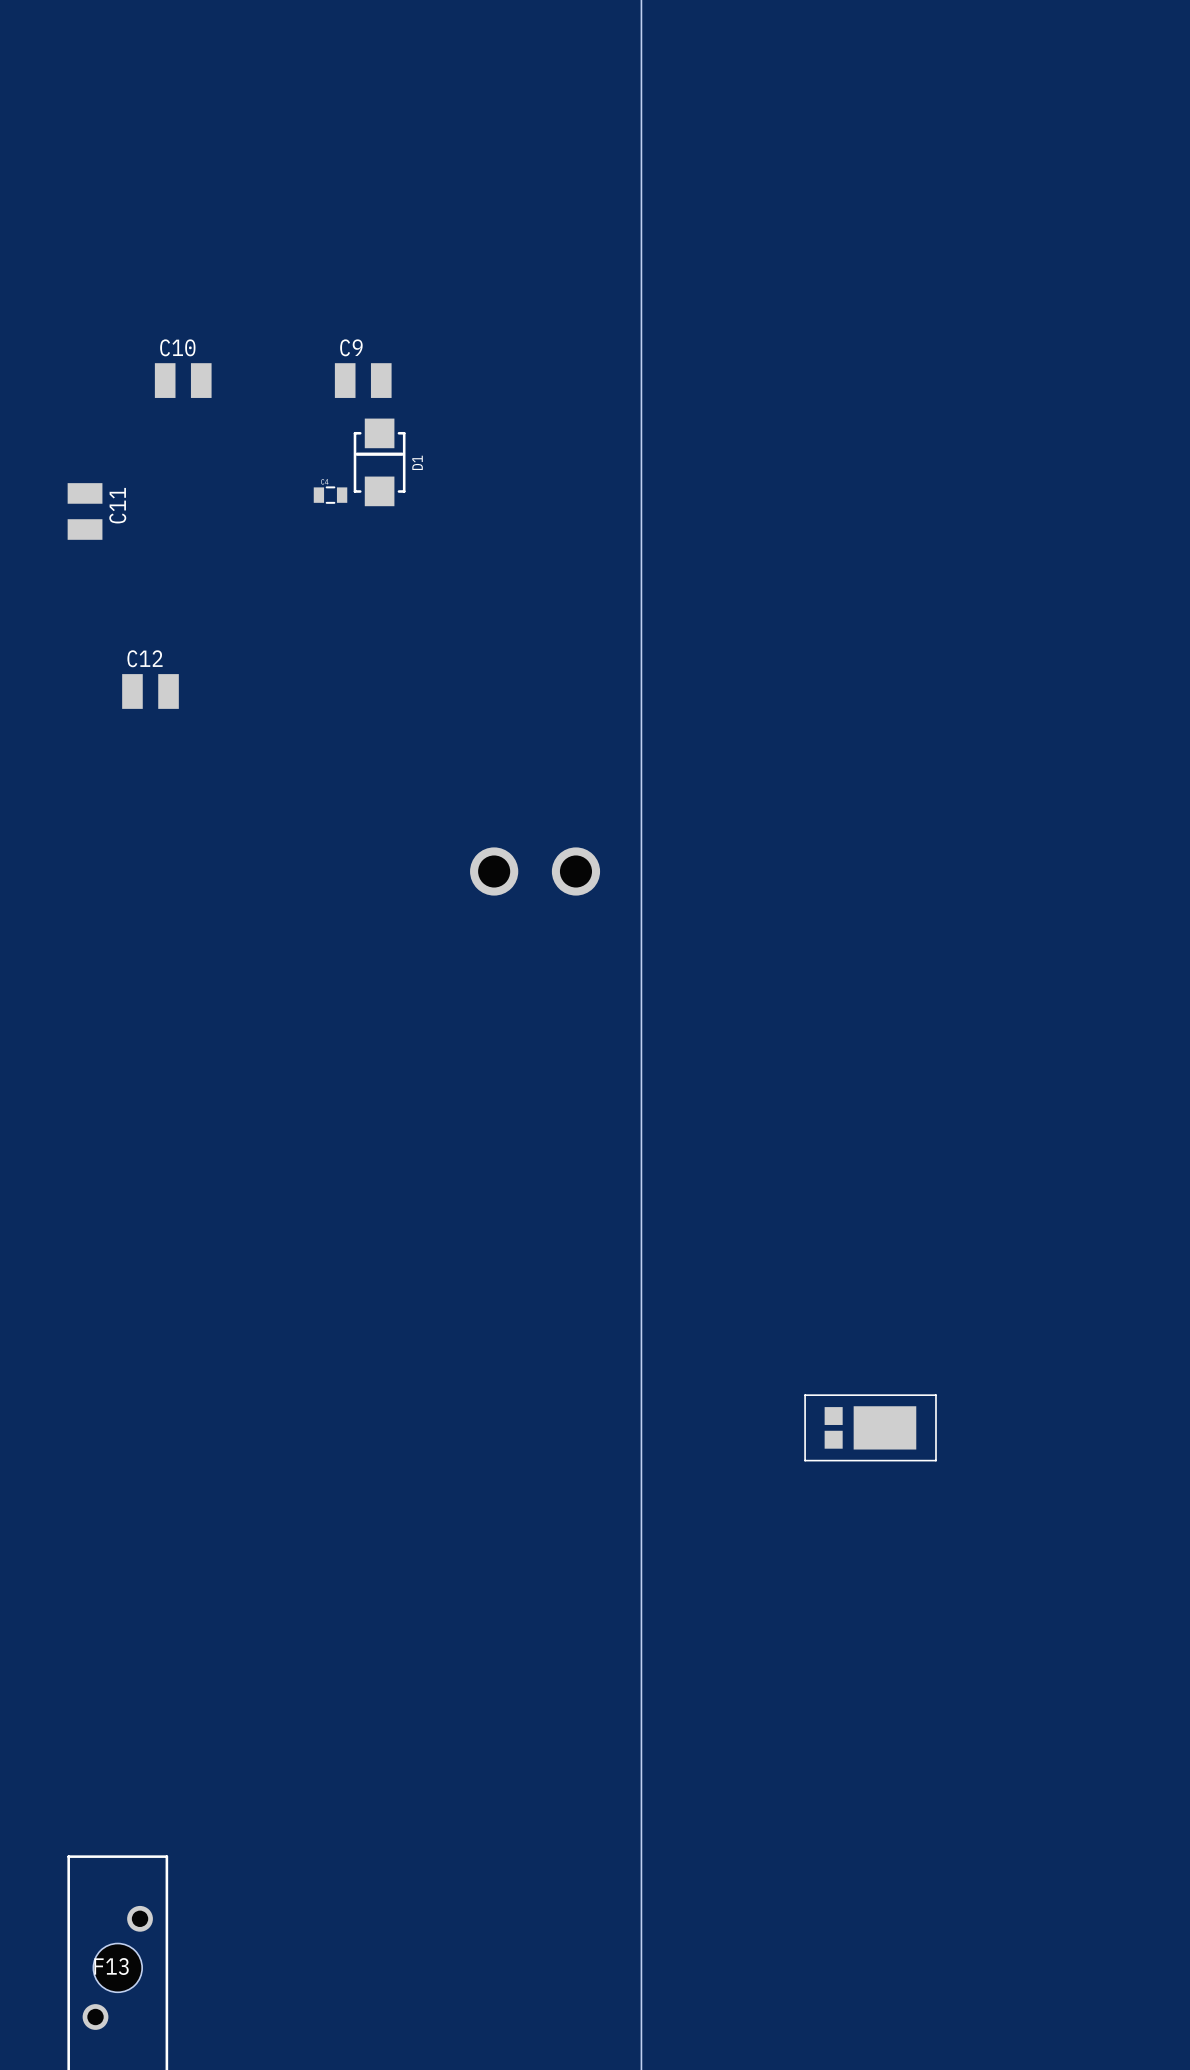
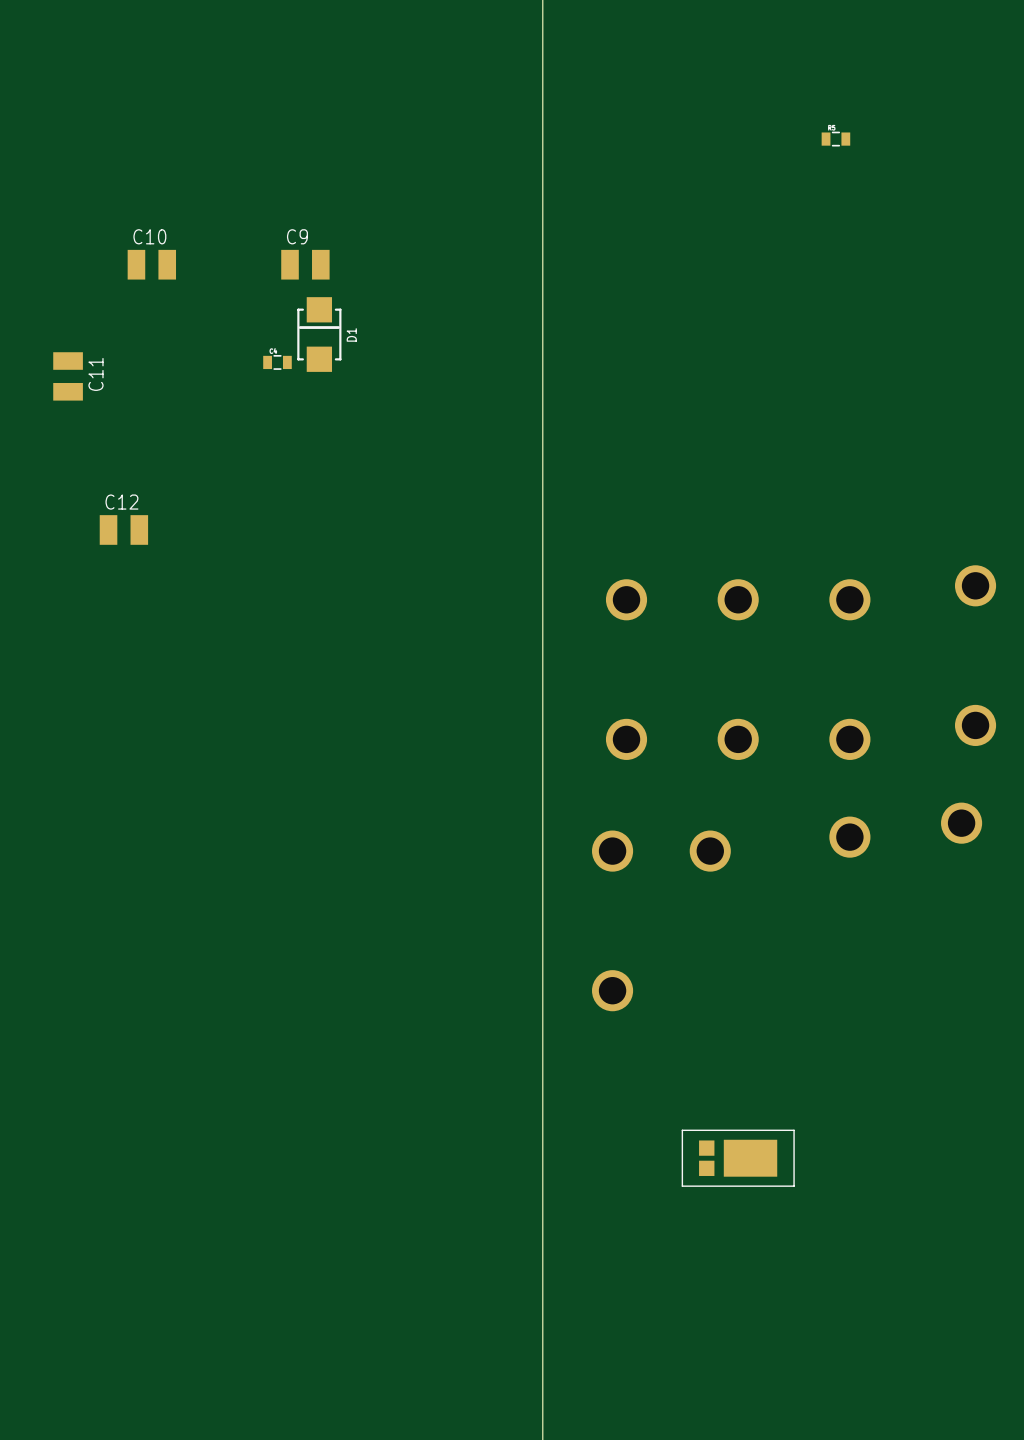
part: none -> (835, 139)
part: none -> (975, 585)
part: none -> (626, 599)
part: none -> (738, 599)
part: none -> (849, 599)
part: (494, 871) -> none
part: (575, 871) -> none
part: none -> (975, 725)
part: none -> (626, 739)
part: none -> (738, 739)
part: none -> (849, 739)
part: none -> (961, 823)
part: none -> (849, 837)
part: none -> (612, 851)
part: none -> (710, 851)
part: none -> (612, 990)

